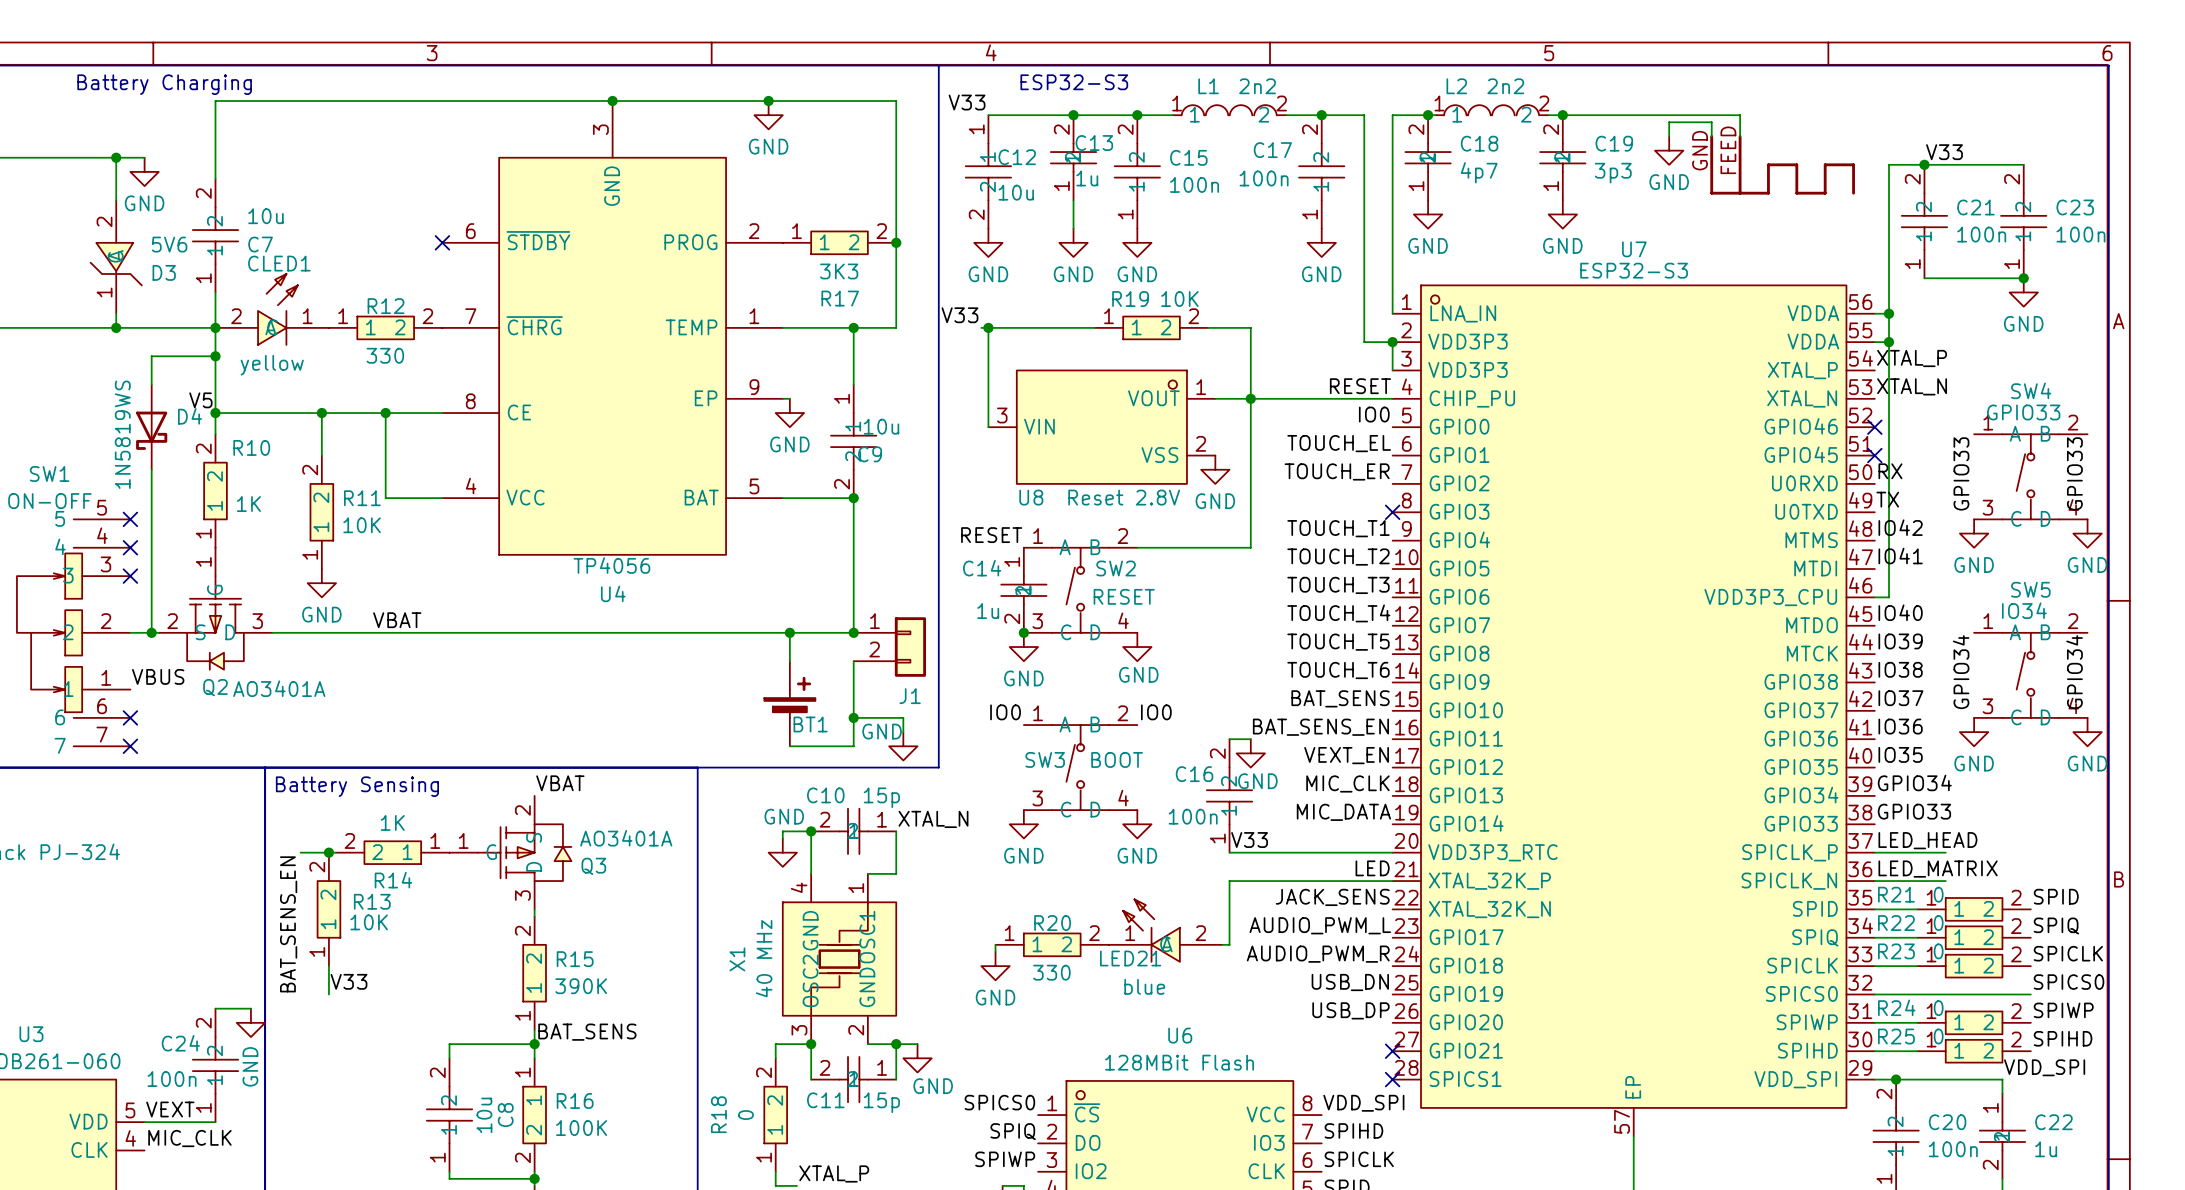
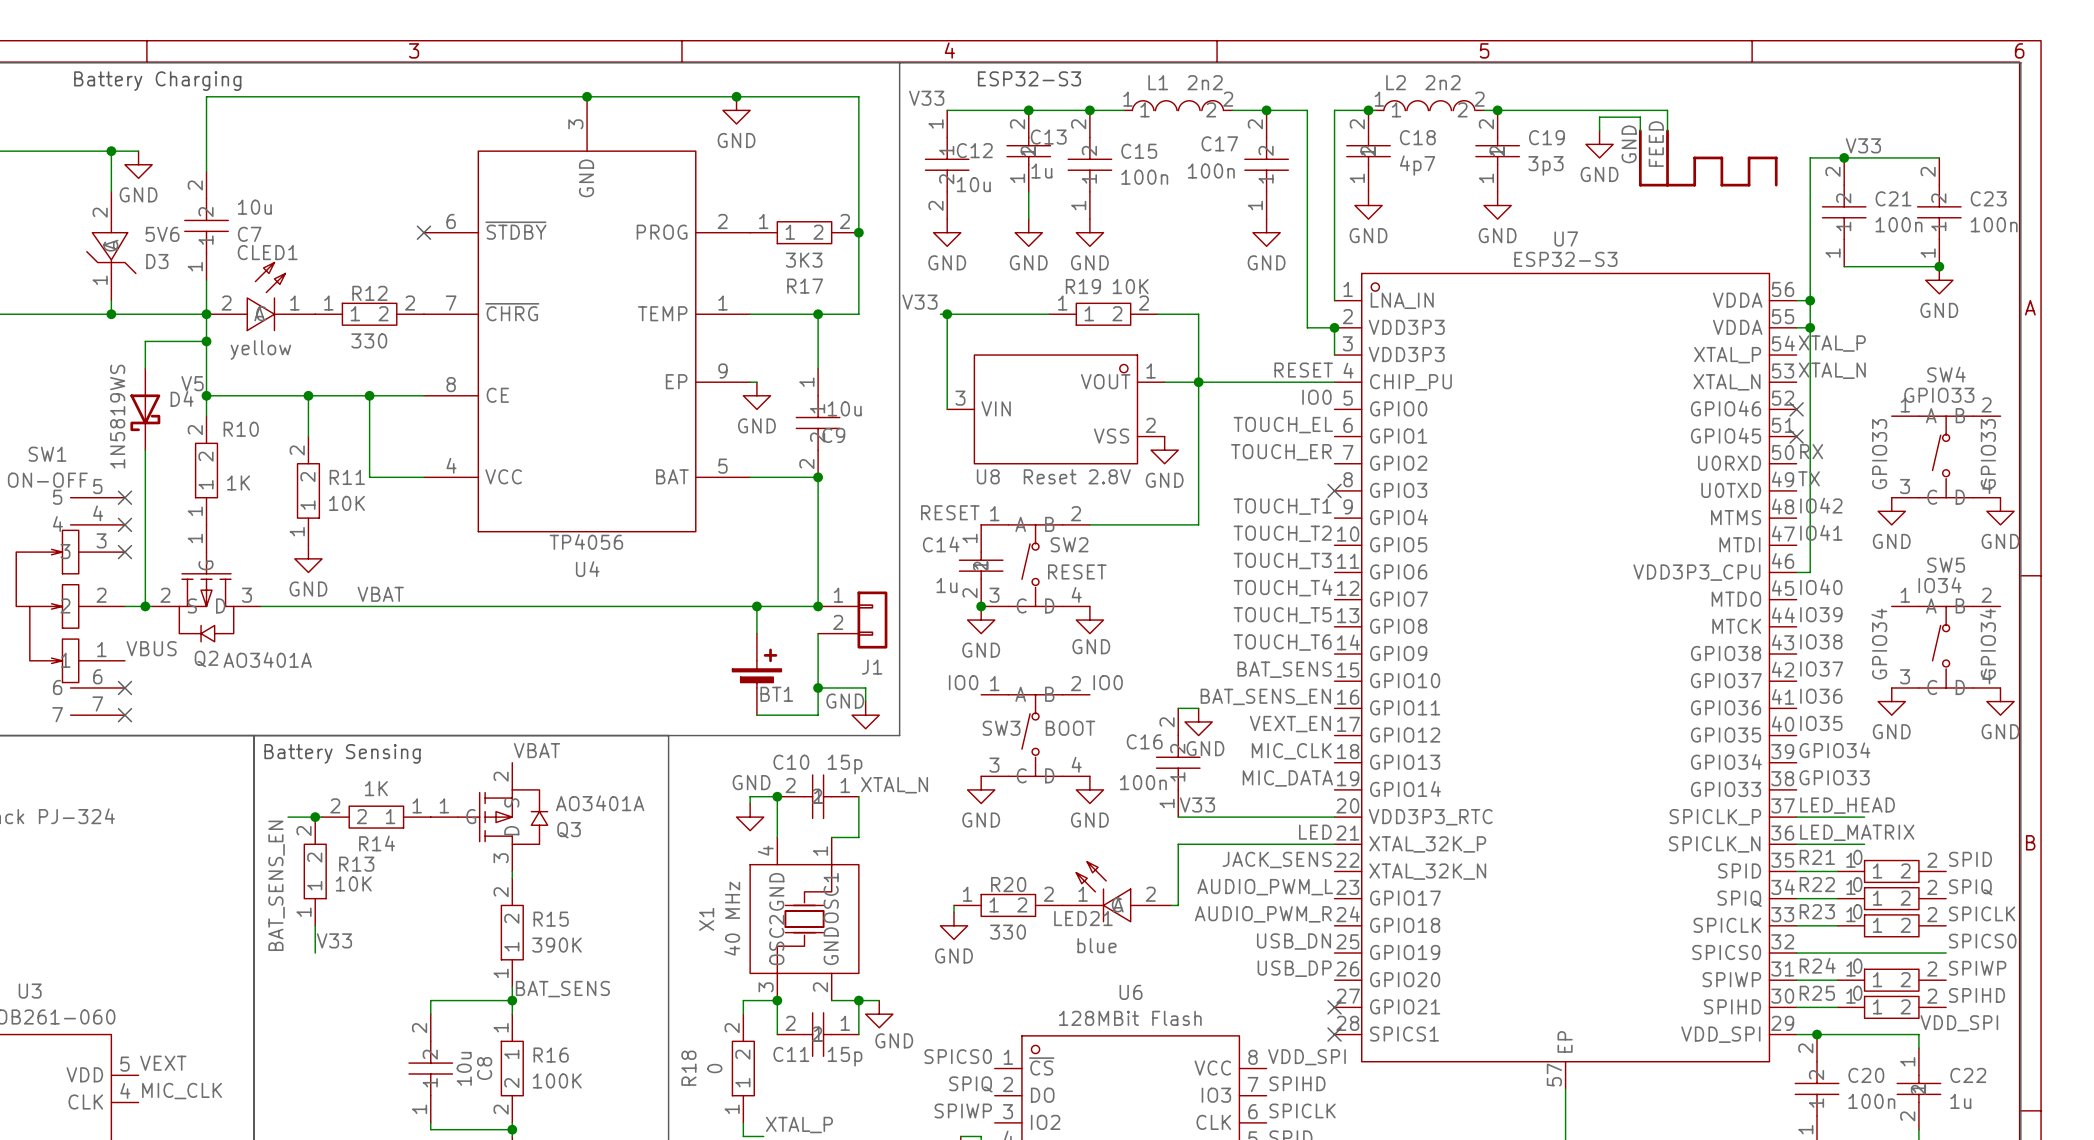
wire: (215, 1008) (250, 1008) -> none
power symbol: GND (250, 1022) -> none
C24: 100n (215, 1065) -> none
wire: (144, 1122) (215, 1122) -> none

